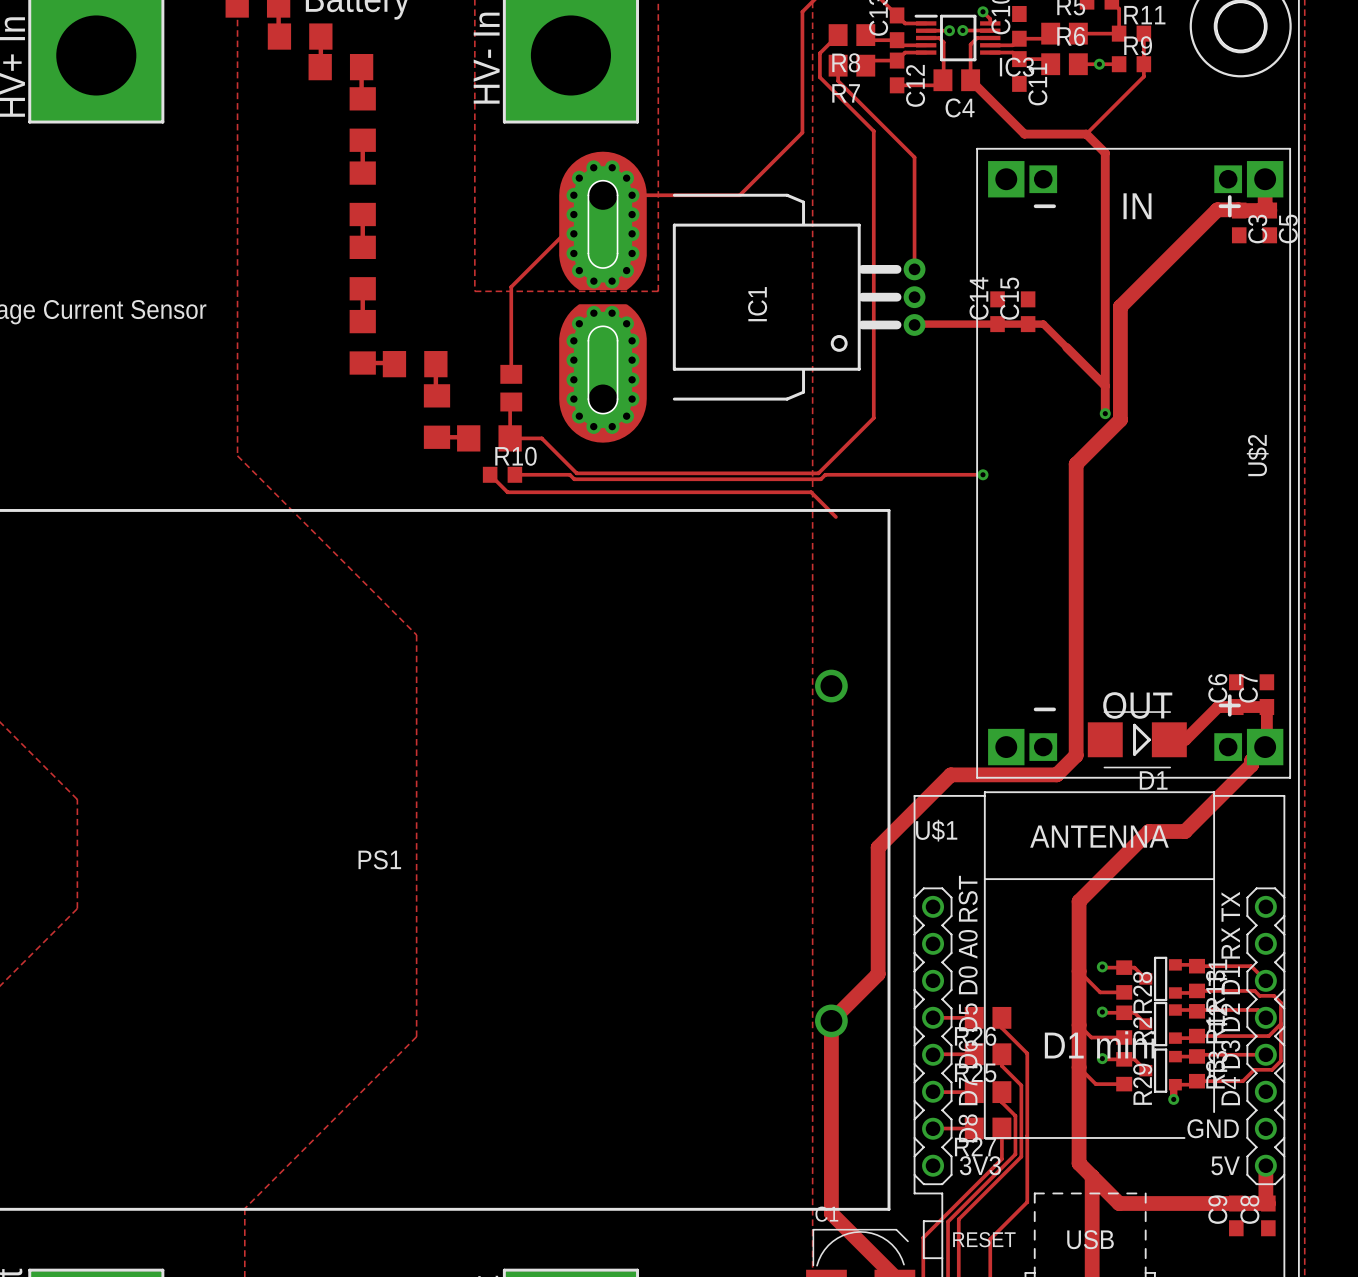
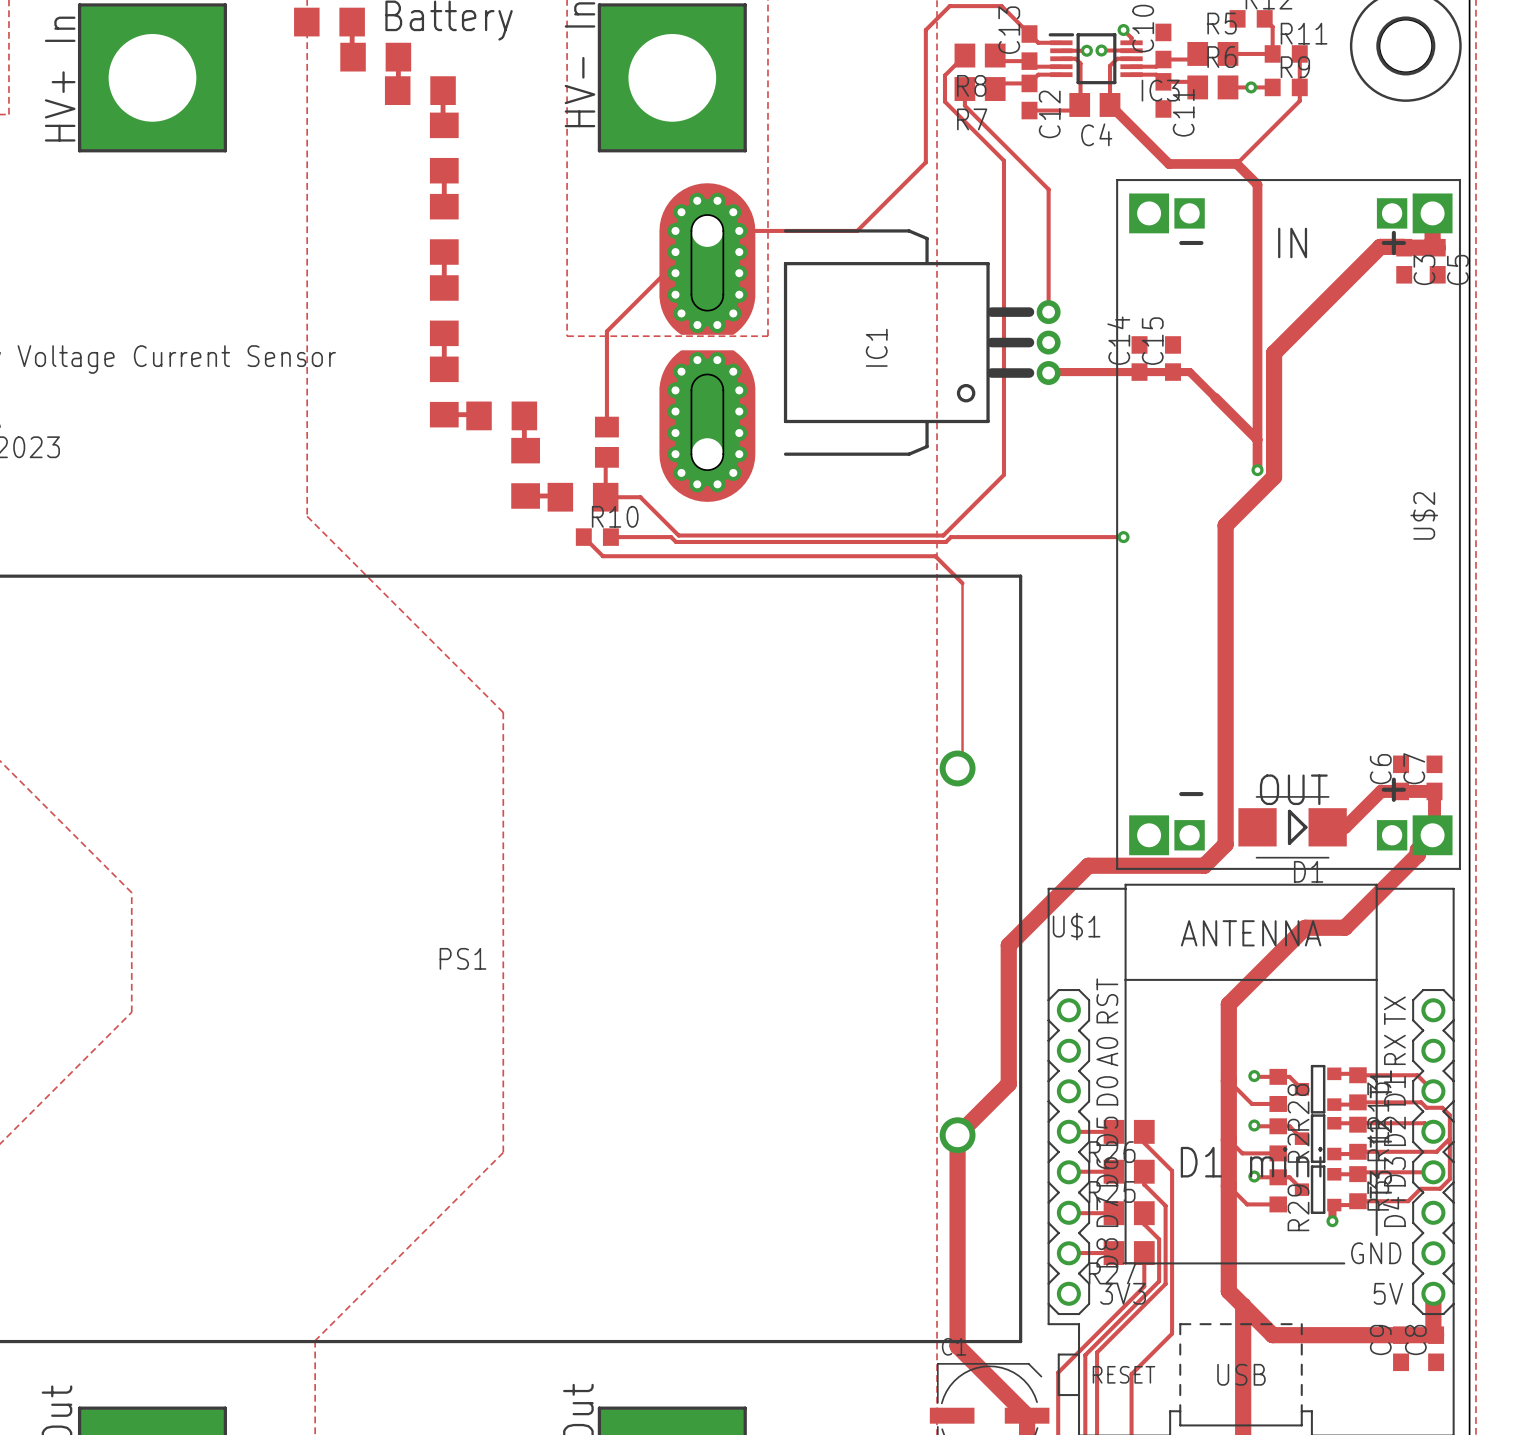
track: none -> (962, 583) (962, 763) (957, 768)

